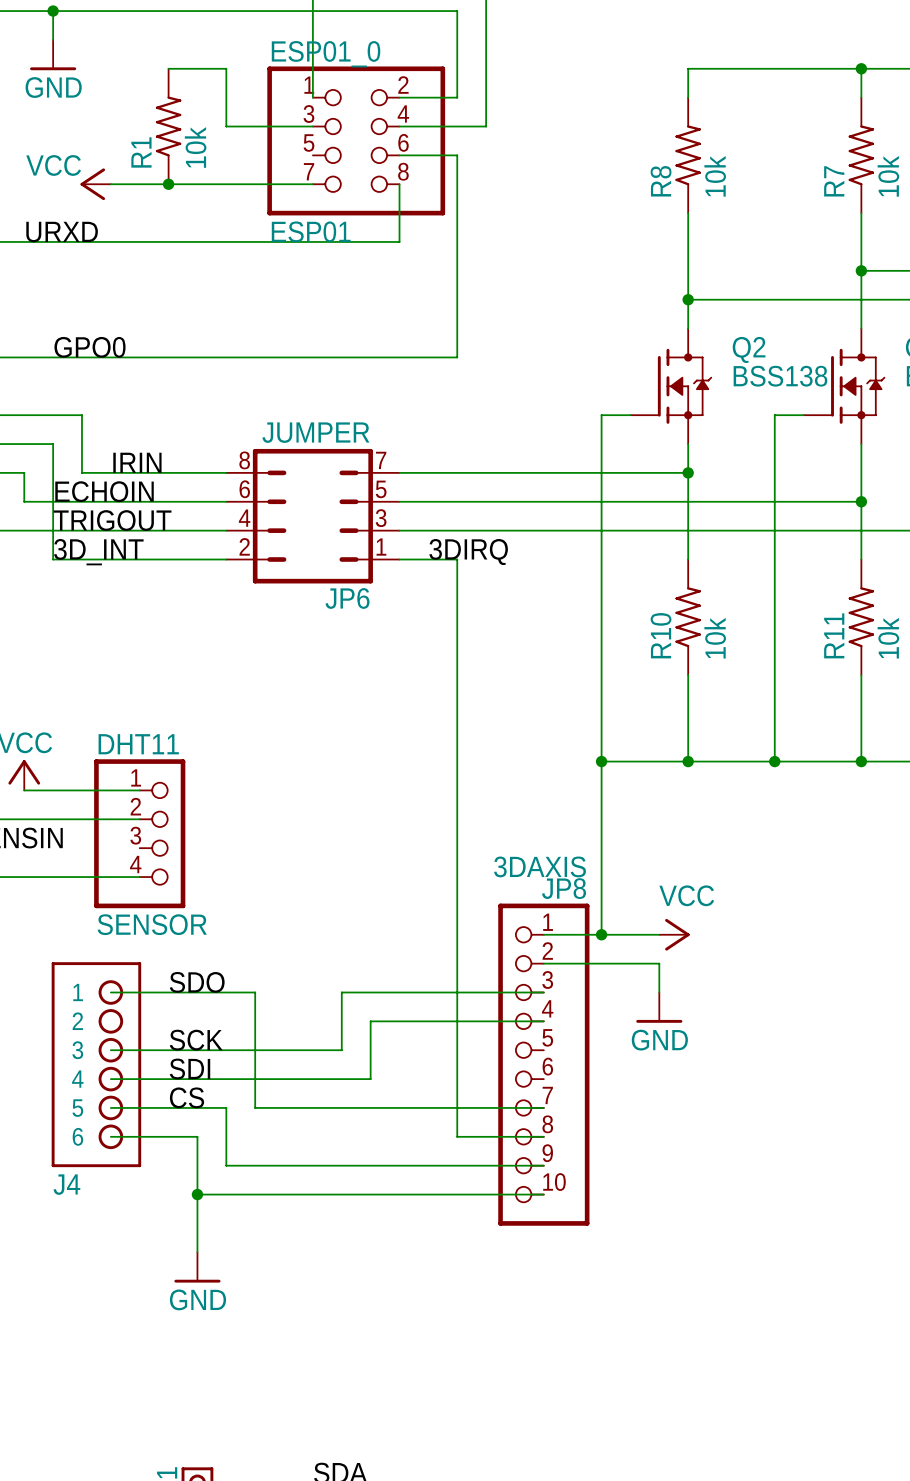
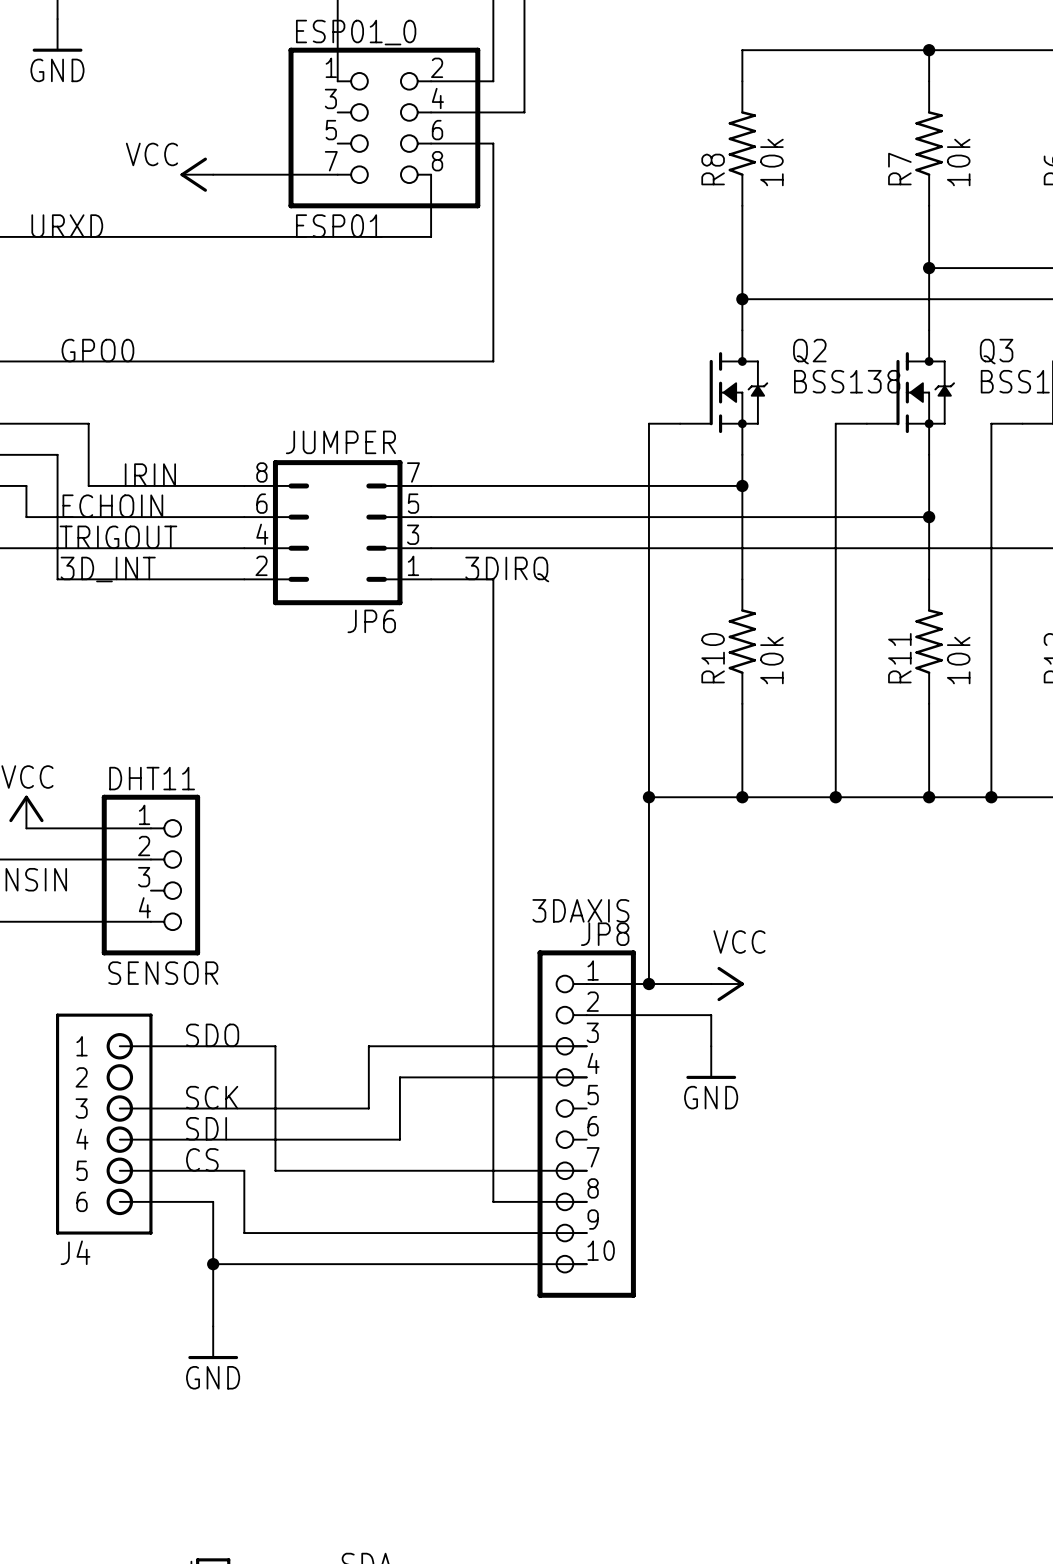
wire: (168, 68) (226, 68) (226, 126) (312, 126) -> none
R1: 10k (168, 126) -> none
power symbol position: VCC (95, 184) -> VCC (196, 174)
wire: (110, 184) (197, 184) -> none
junction: (168, 184) -> none

